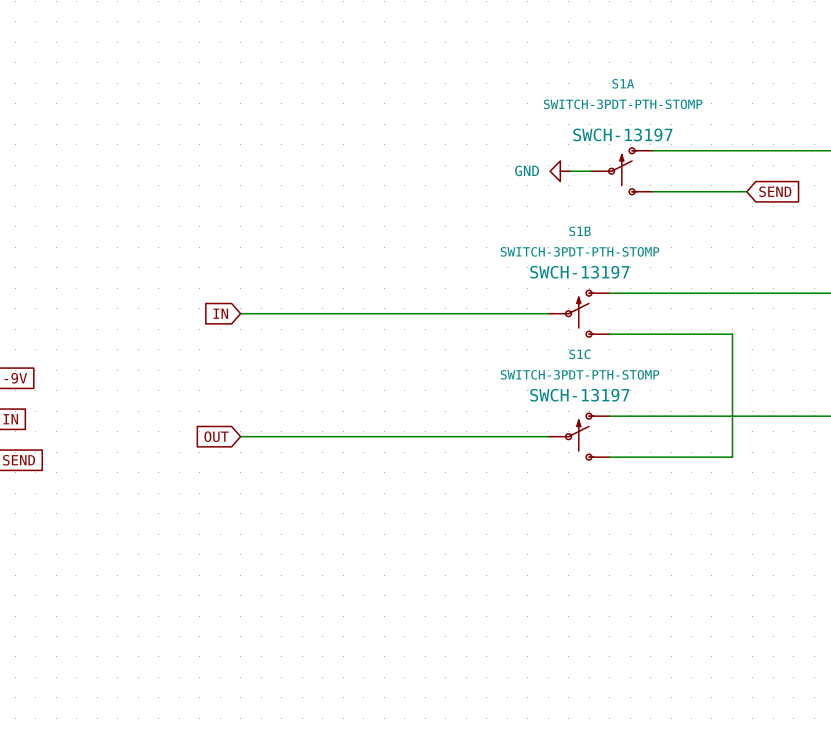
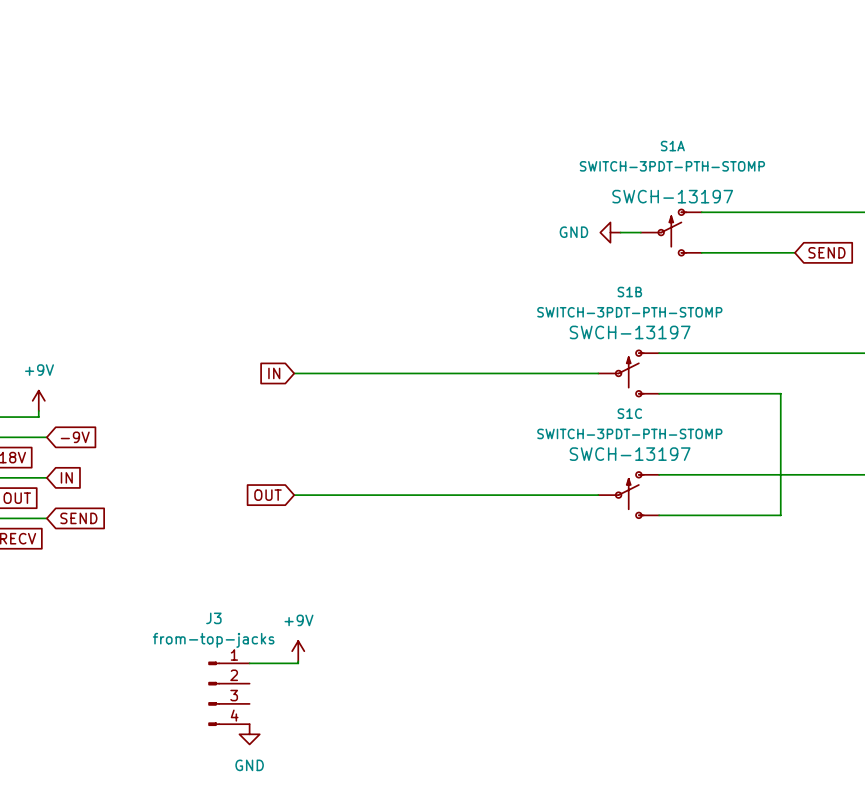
power symbol: none -> +9V (298, 651)
wire: none -> (298, 661) (298, 663) (249, 663)
J3: none -> from-top-jacks (229, 693)
power symbol: none -> GND (249, 734)

